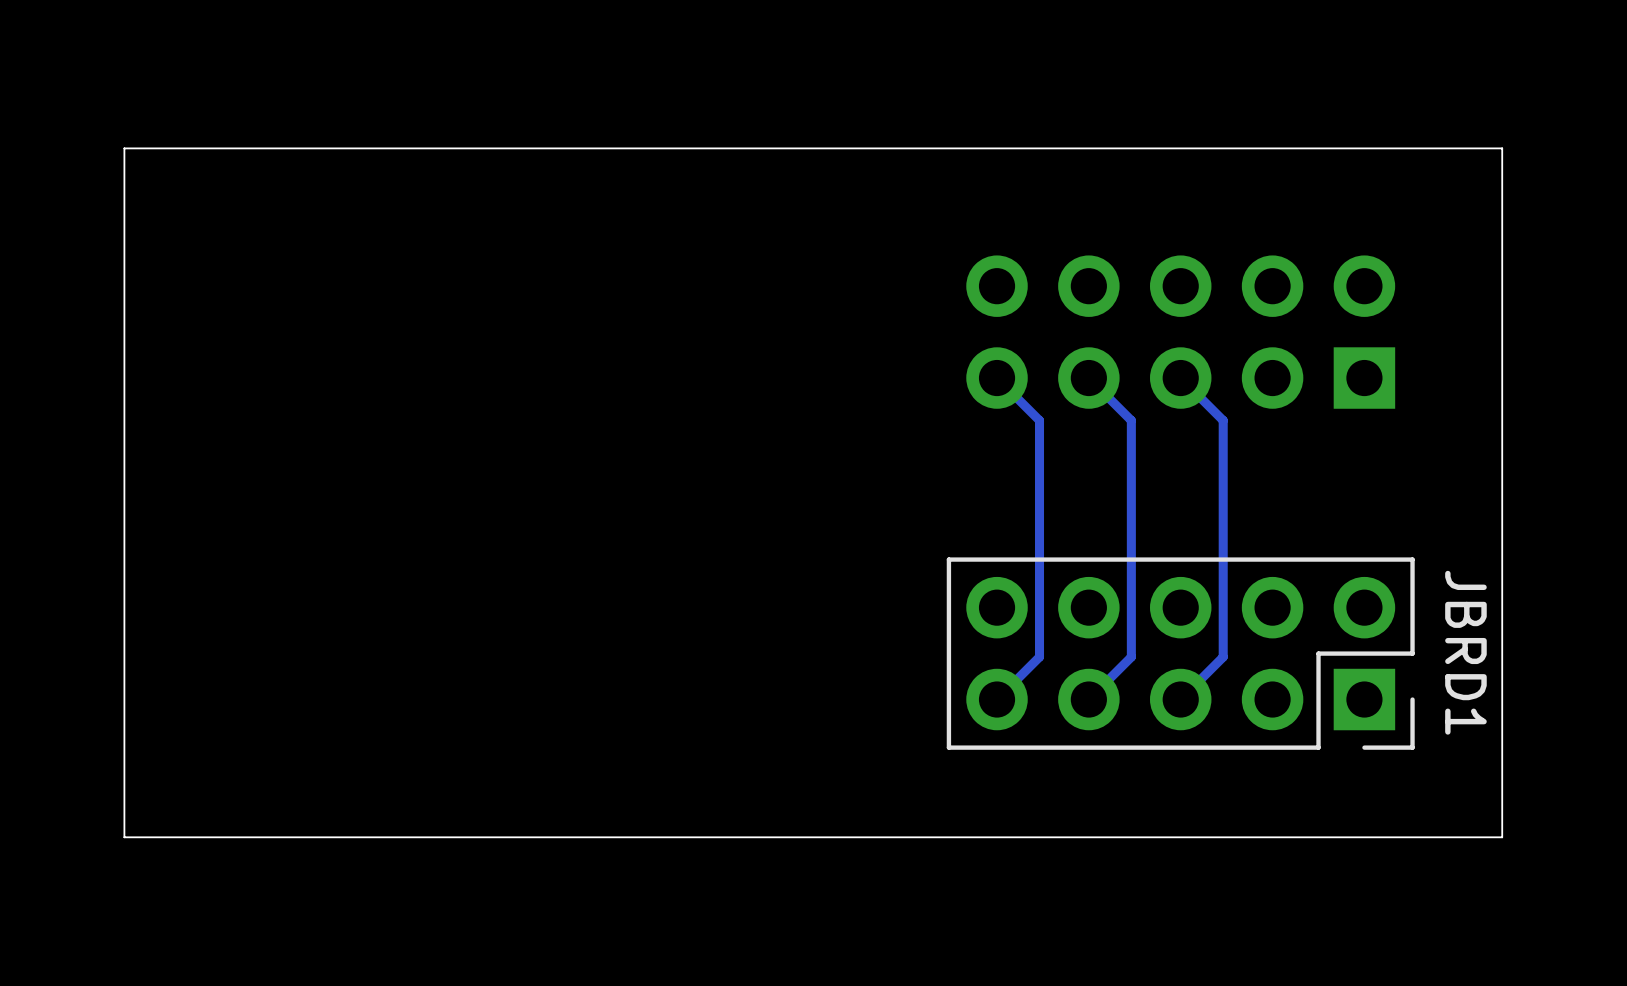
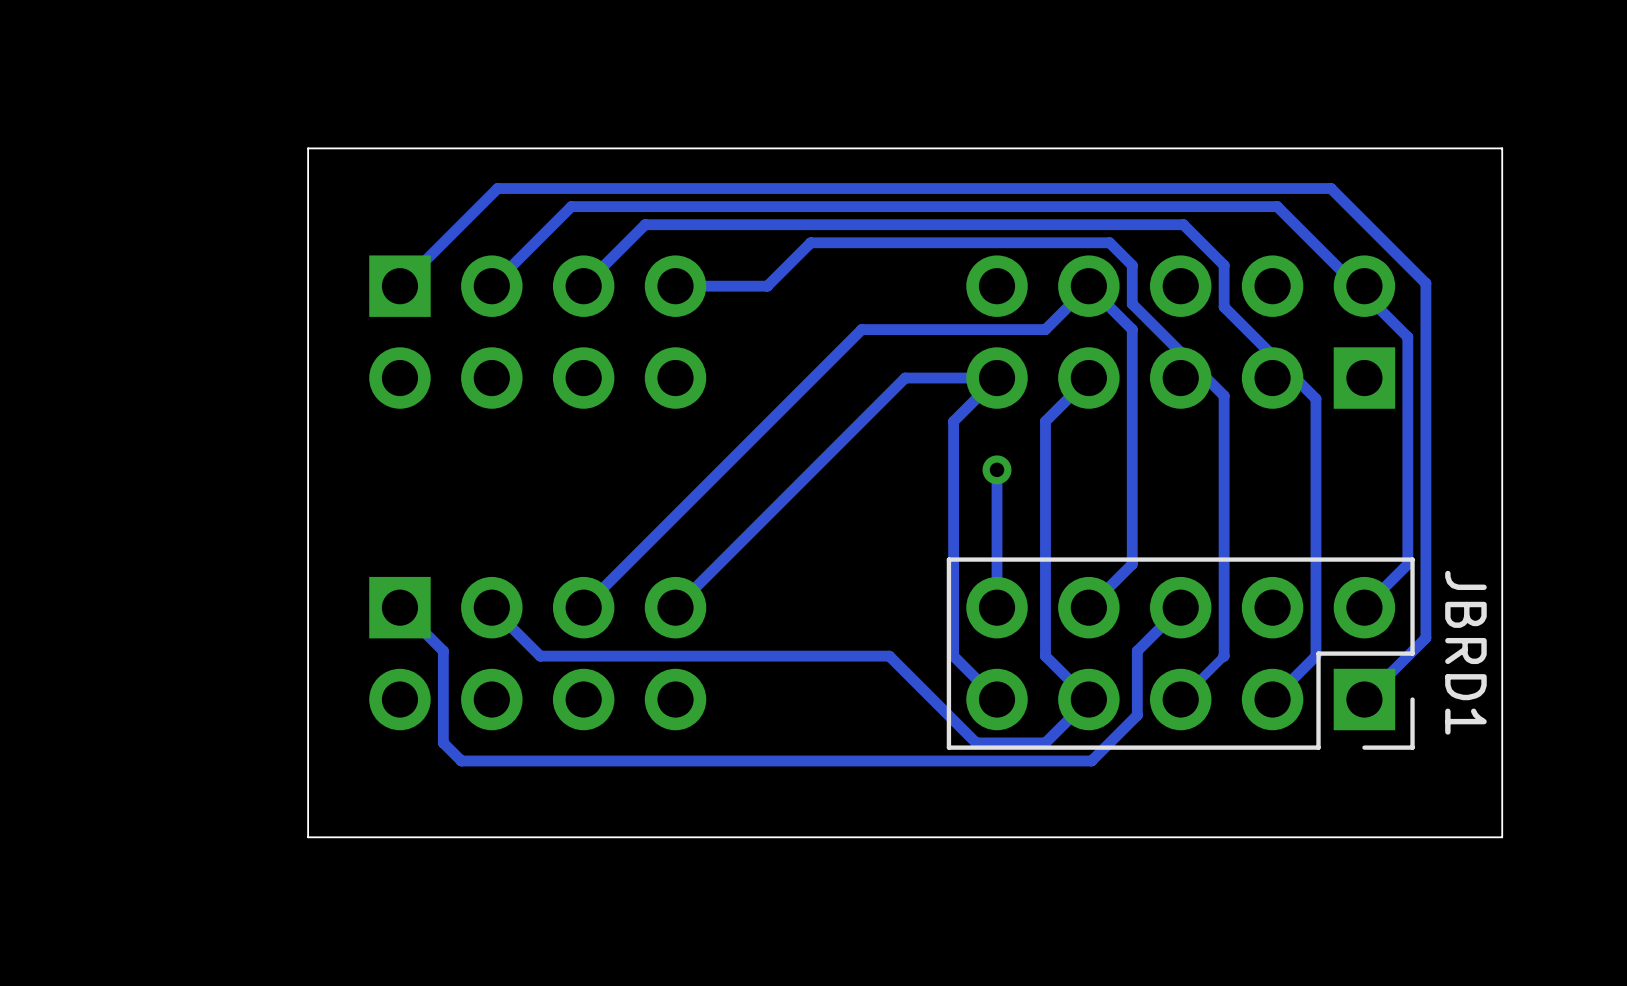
board edge: (308, 148) (124, 148) (124, 837) (308, 837) -> (308, 148) (308, 837)
track: none -> (399, 286) (497, 188) (1331, 188) (1425, 283) (1425, 638) (1364, 699)
track: none -> (491, 286) (571, 206) (1277, 206) (1407, 337) (1407, 564) (1364, 607)
track: none -> (583, 286) (645, 224) (1183, 224) (1224, 265) (1224, 307) (1315, 398) (1315, 656) (1272, 699)
part: none -> (537, 332)
track: (997, 378) (1039, 420) (1039, 657) (997, 699) -> (675, 607) (905, 378) (997, 378) (953, 421) (953, 656) (997, 699)
track: none -> (1065, 378) (1088, 378) (1045, 421) (1045, 656) (1088, 699) (1045, 742) (976, 742) (889, 656) (540, 656) (491, 607)
track: (1088, 378) (1131, 420) (1131, 657) (1088, 699) -> none
track: (1180, 378) (1223, 420) (1223, 657) -> (675, 286) (767, 286) (810, 242) (1109, 242) (1132, 265) (1132, 304) (1224, 395) (1223, 657)
track: none -> (997, 469) (997, 607)
via: none -> (997, 469)
track: none -> (1088, 607) (1132, 564) (1132, 329) (1088, 286) (1045, 329) (861, 329) (583, 607)
track: none -> (1180, 607) (1137, 651) (1137, 715) (1091, 761) (461, 761) (443, 742) (443, 651) (399, 607)
part: none -> (537, 653)

